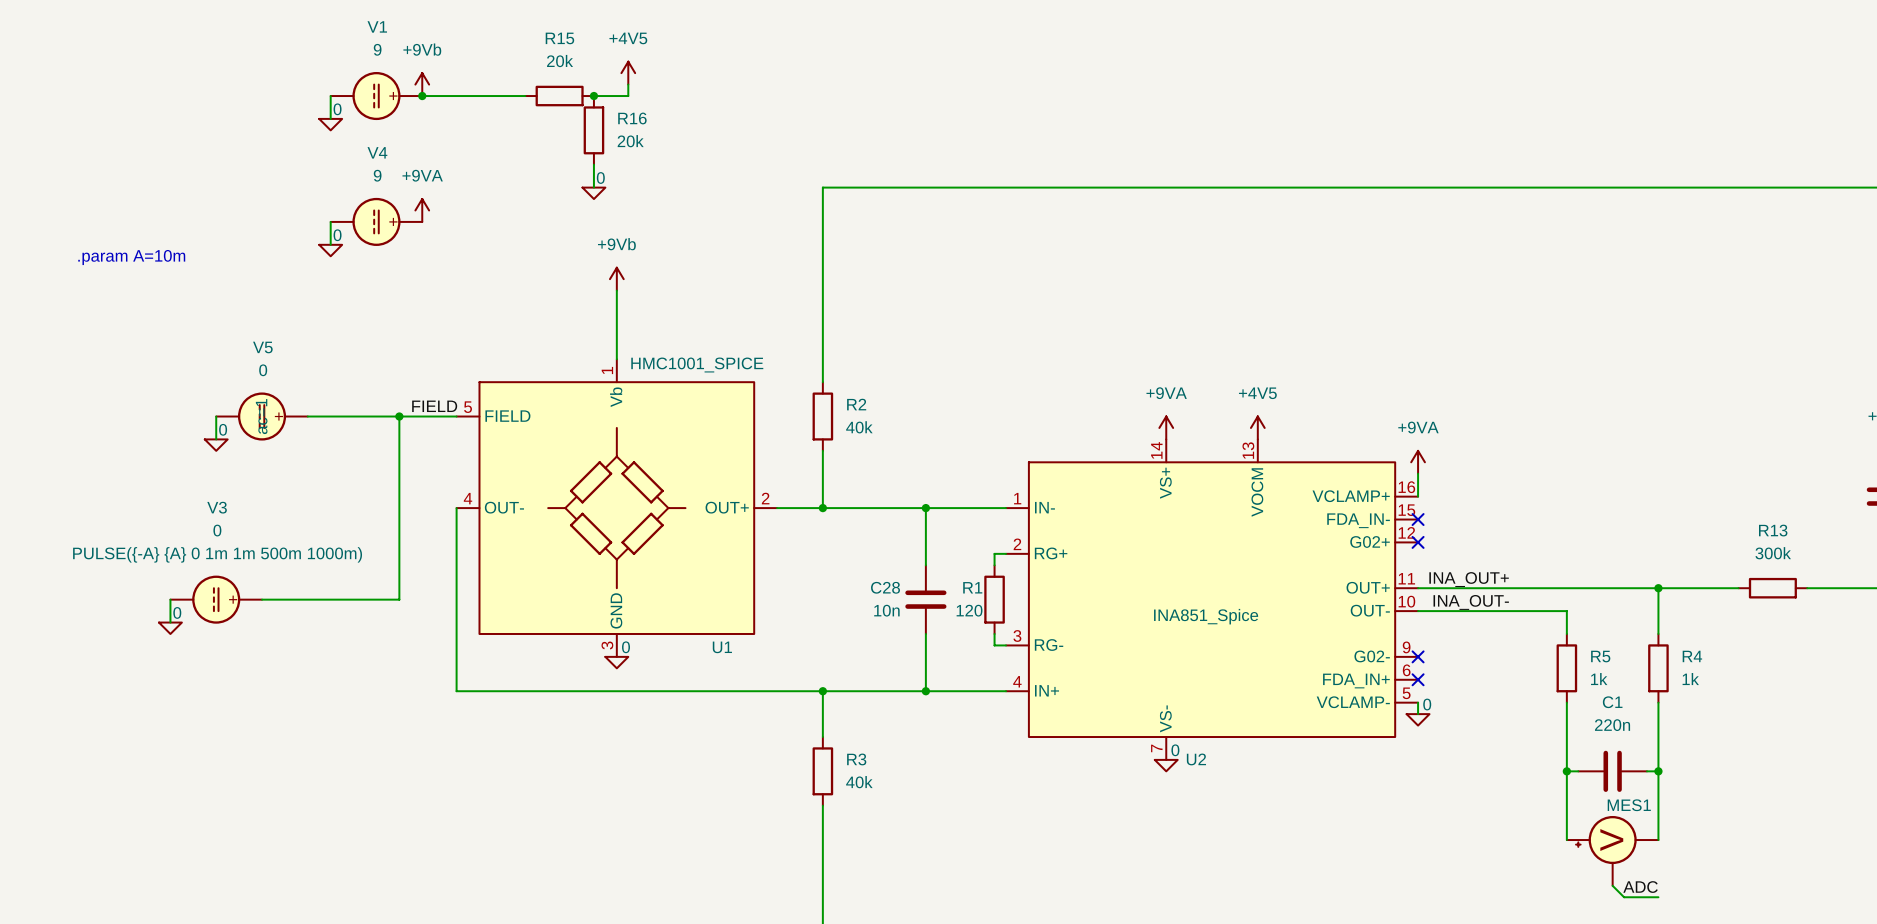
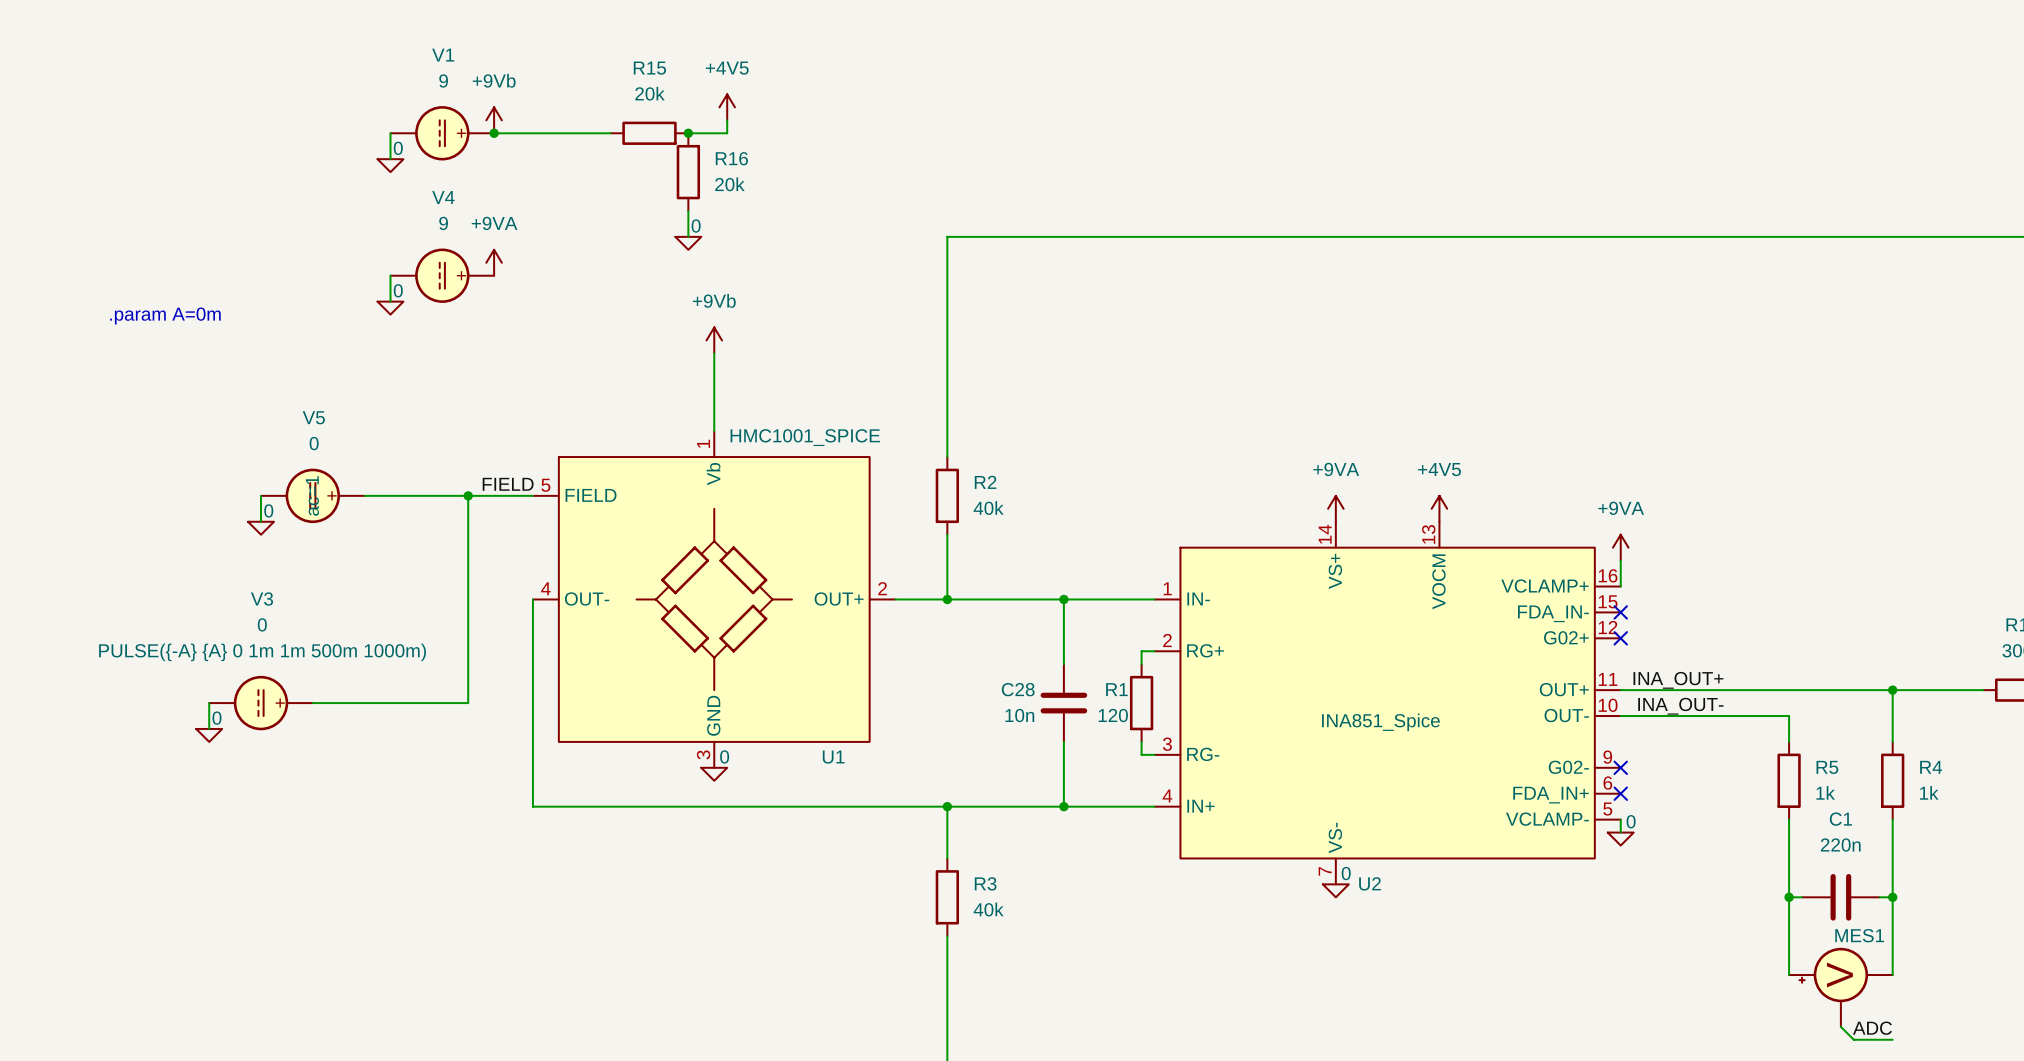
text: .param A=10m (131, 257) -> .param A=0m (165, 315)

